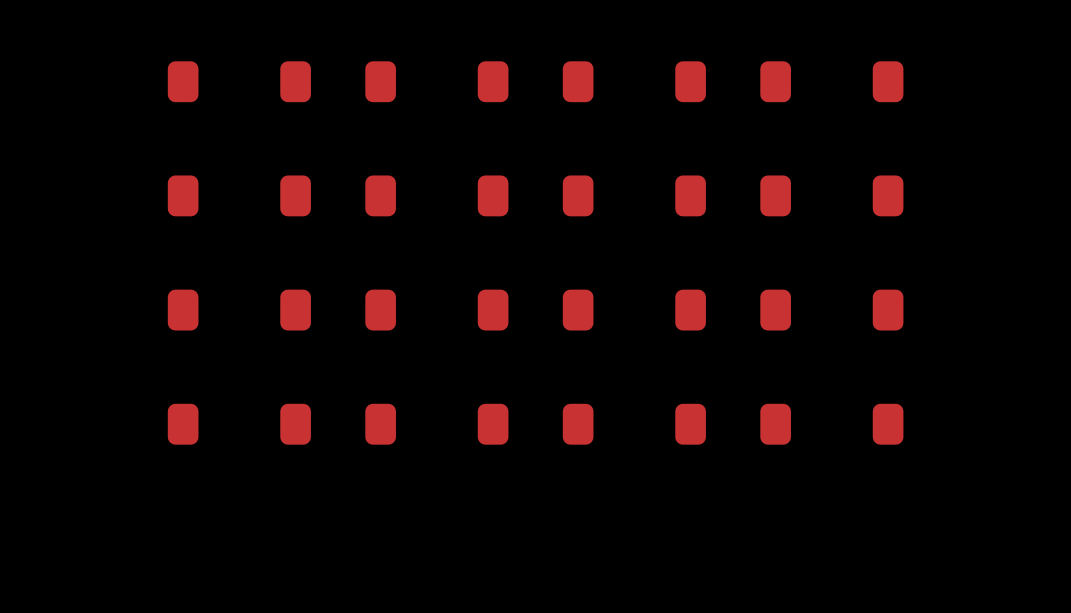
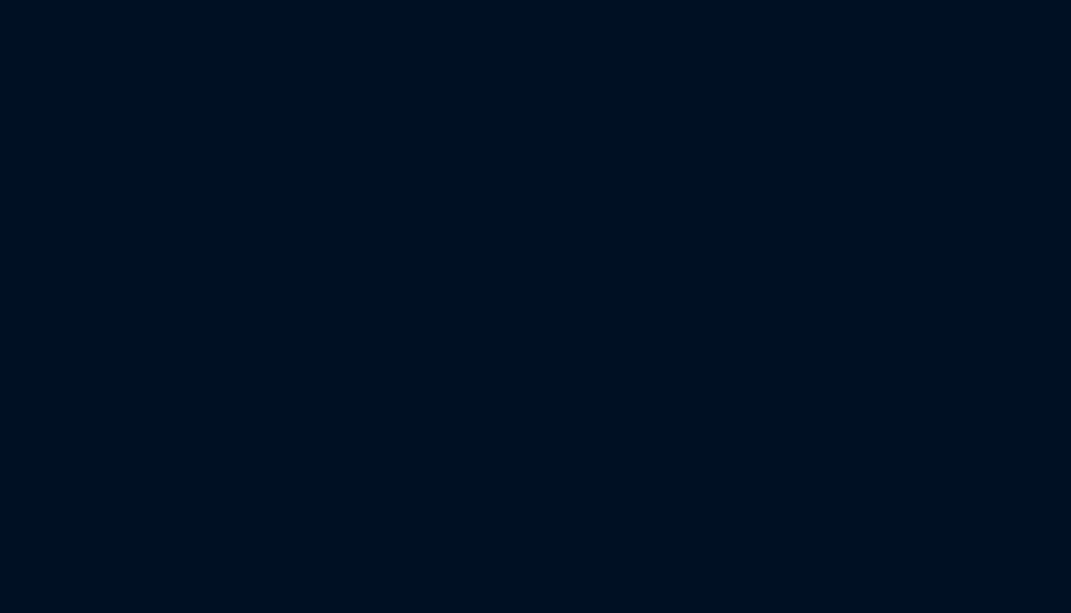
part: (239, 81) -> none
part: (436, 81) -> none
part: (634, 81) -> none
part: (831, 81) -> none
part: (239, 195) -> none
part: (436, 195) -> none
part: (634, 195) -> none
part: (831, 195) -> none
part: (239, 310) -> none
part: (436, 310) -> none
part: (634, 310) -> none
part: (831, 310) -> none
part: (239, 424) -> none
part: (436, 424) -> none
part: (634, 424) -> none
part: (831, 424) -> none

